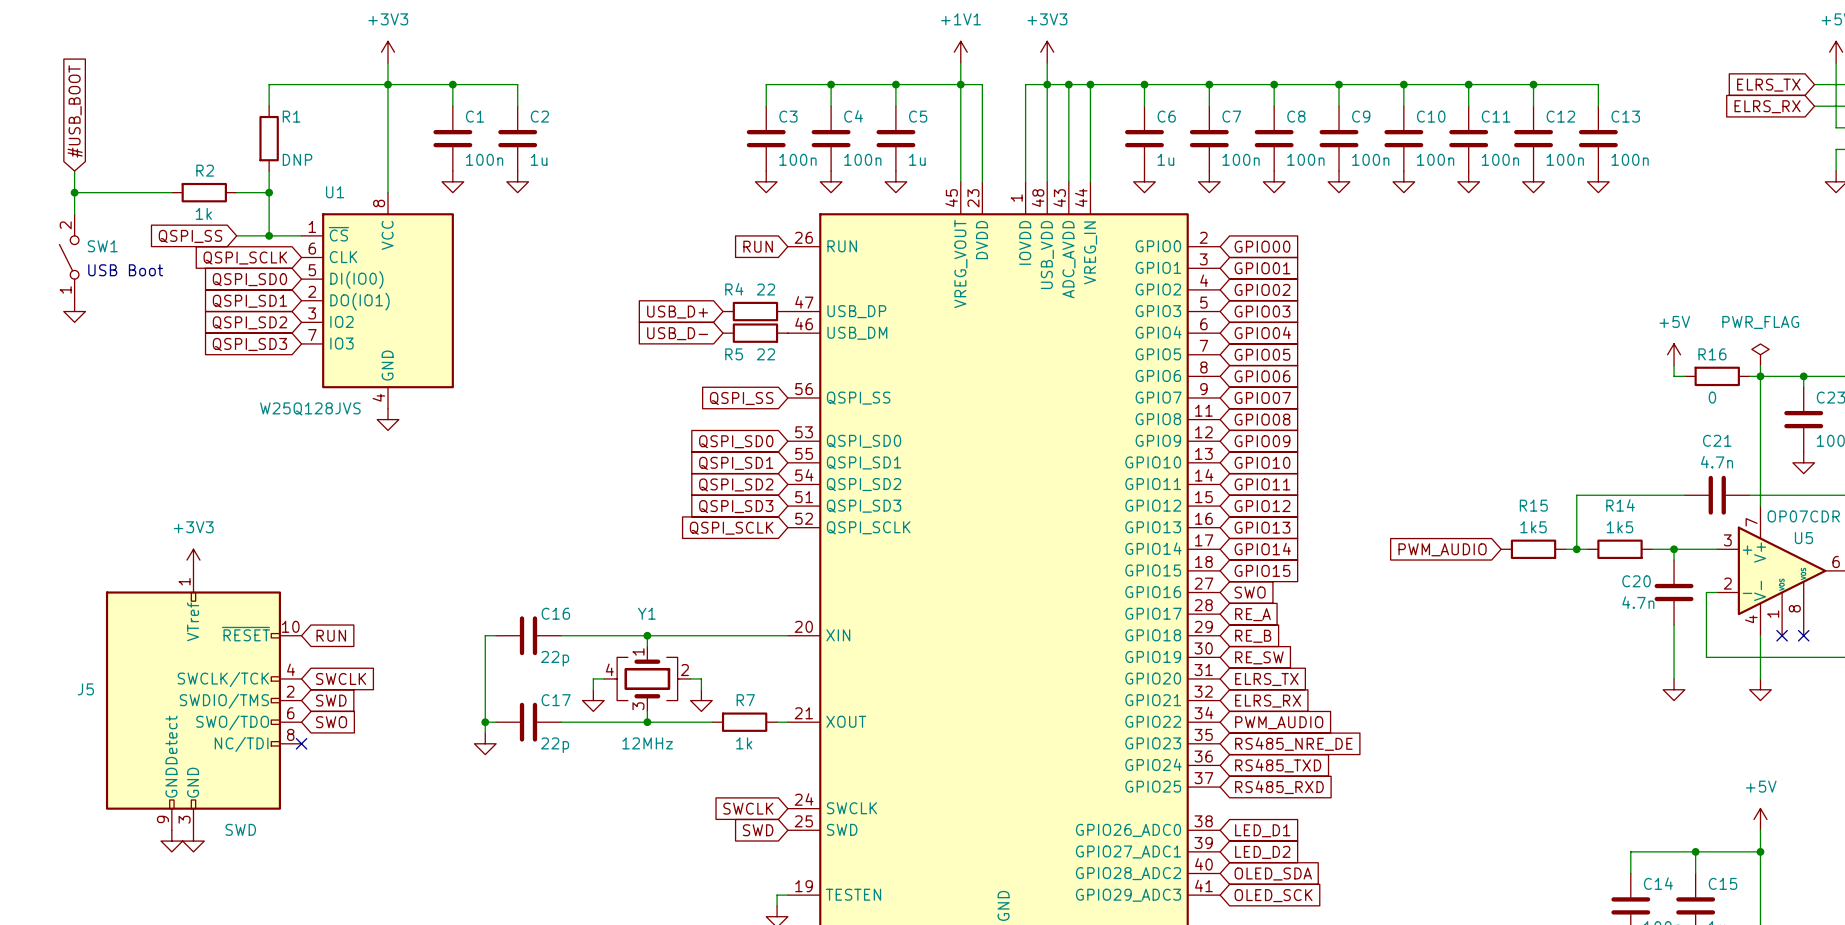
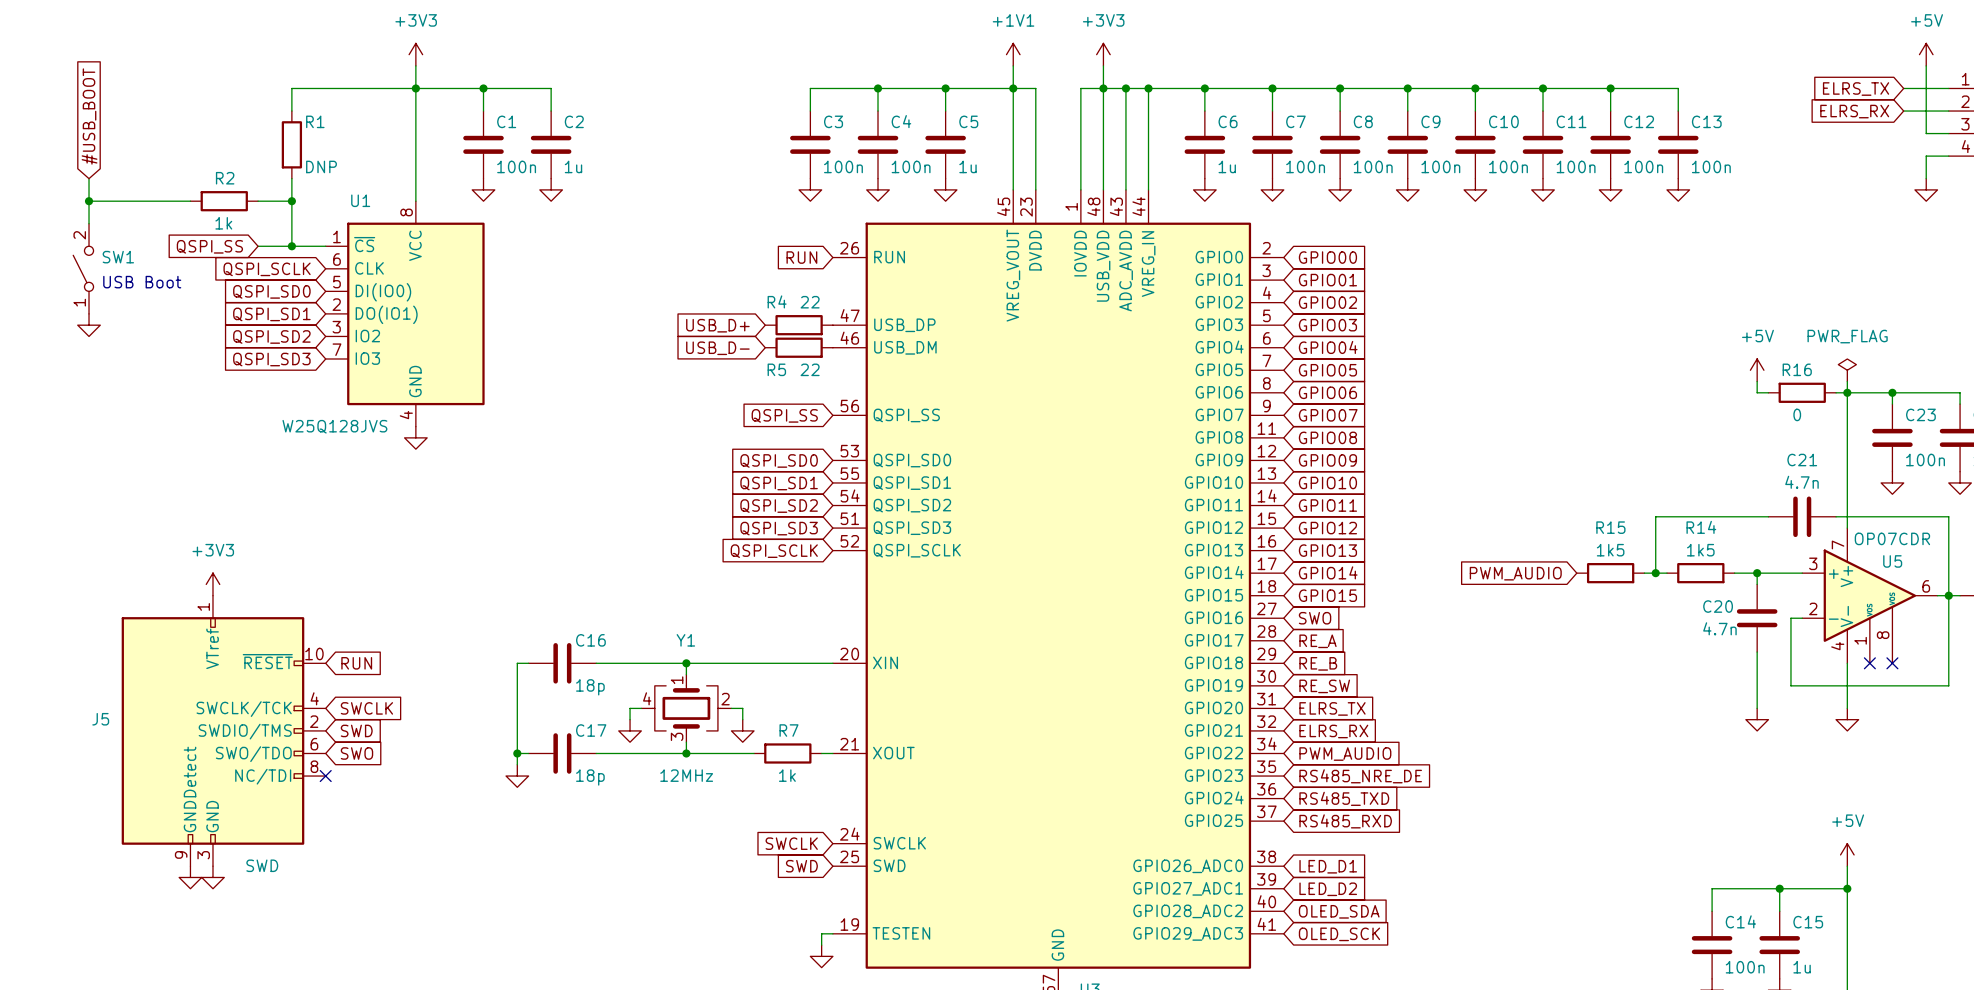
C16 value: 22p (555, 658) -> 18p (590, 687)
C17 value: 22p (555, 745) -> 18p (590, 777)

